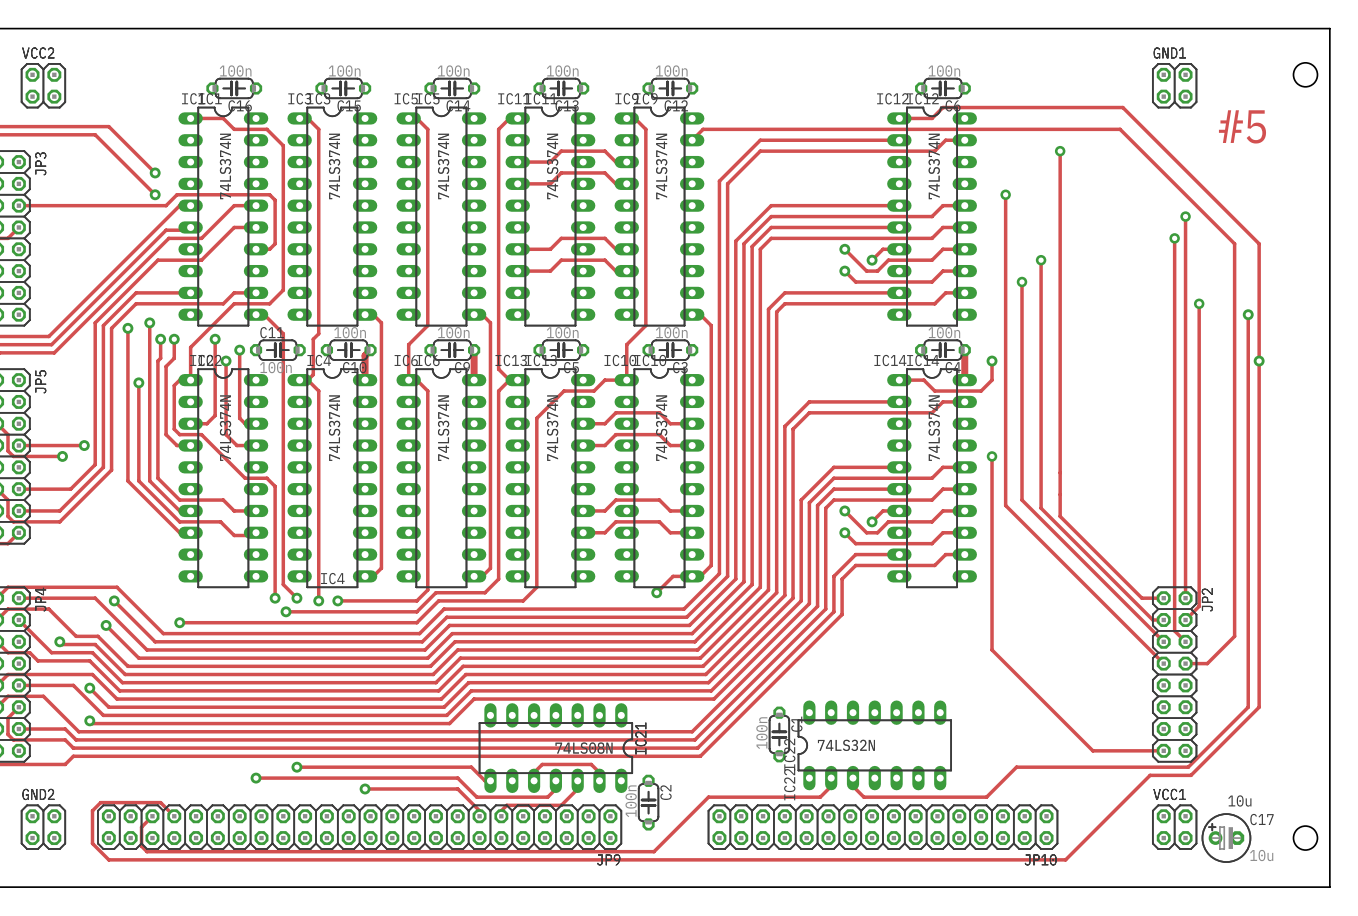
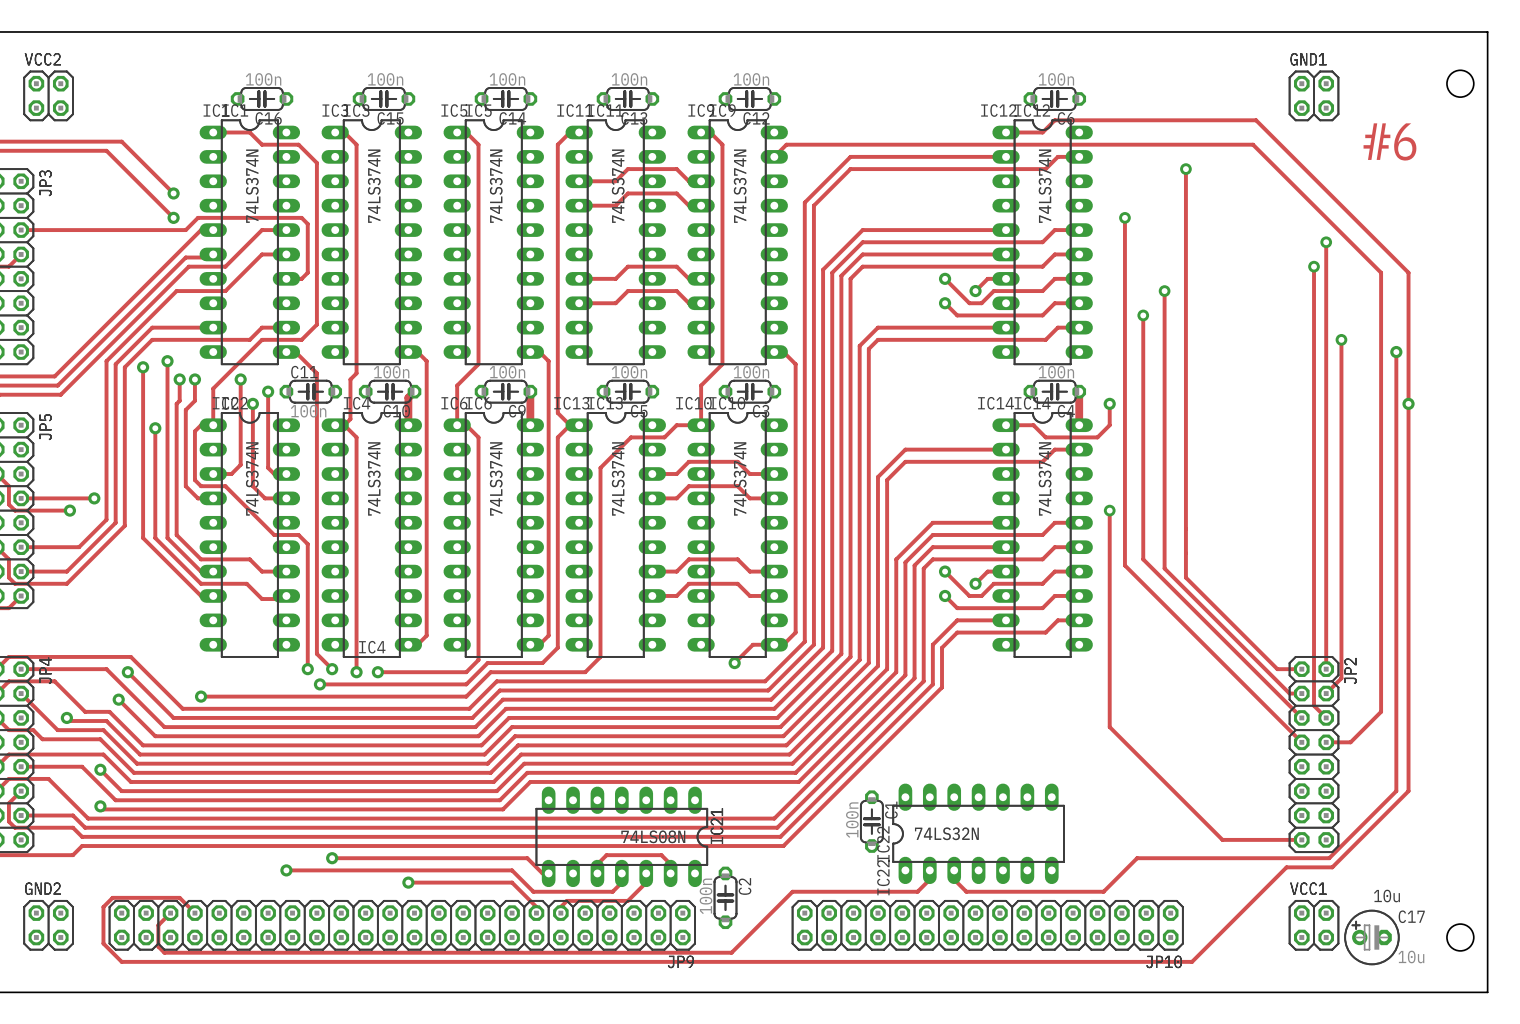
text: #5 (1242, 126) -> #6 (1389, 141)

